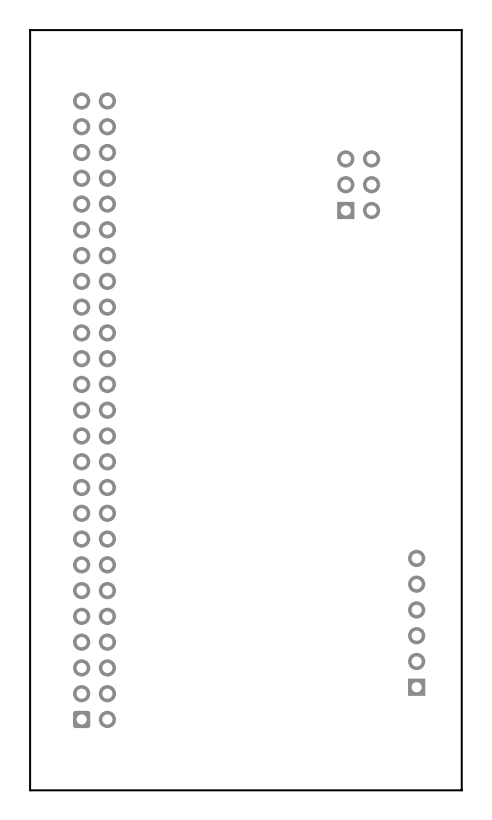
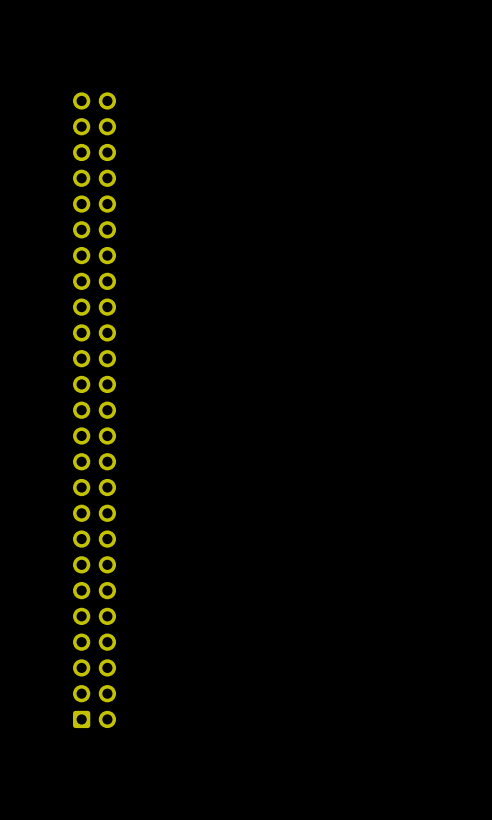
board edge: (461, 30) (461, 790) (30, 790) (30, 30) (461, 30) -> none
part: (358, 184) -> none
part: (416, 622) -> none

